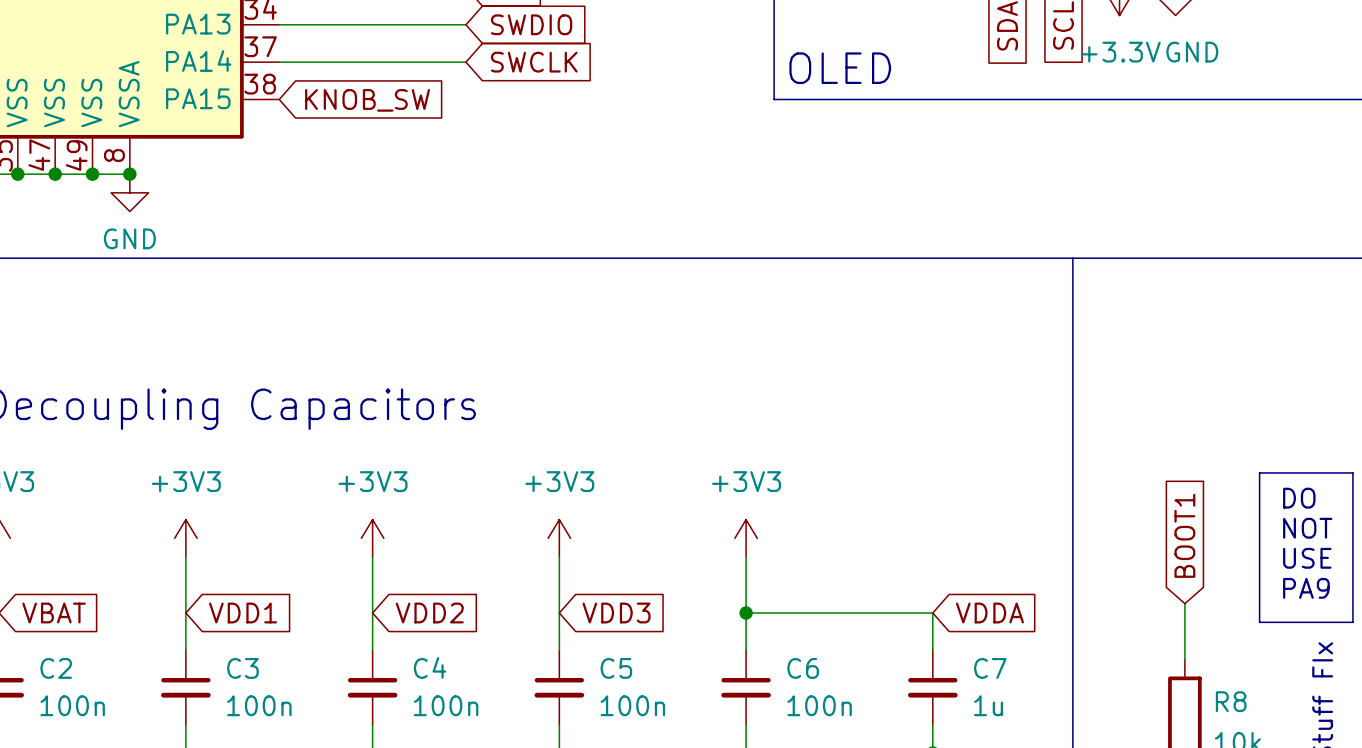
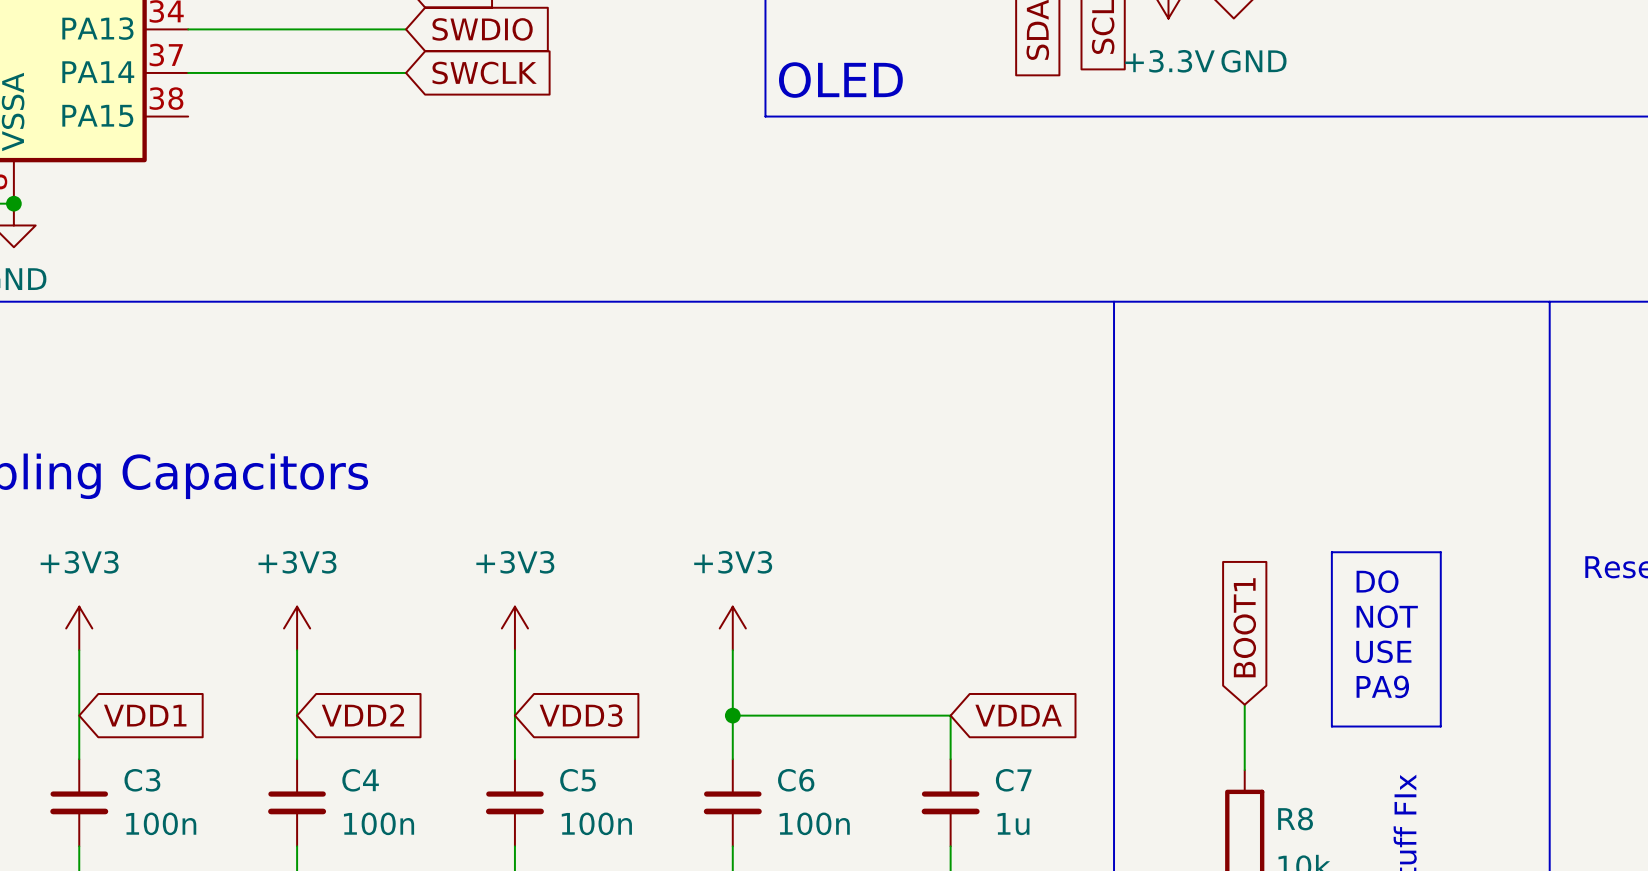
global label: KNOB_SW (367, 100) -> none

